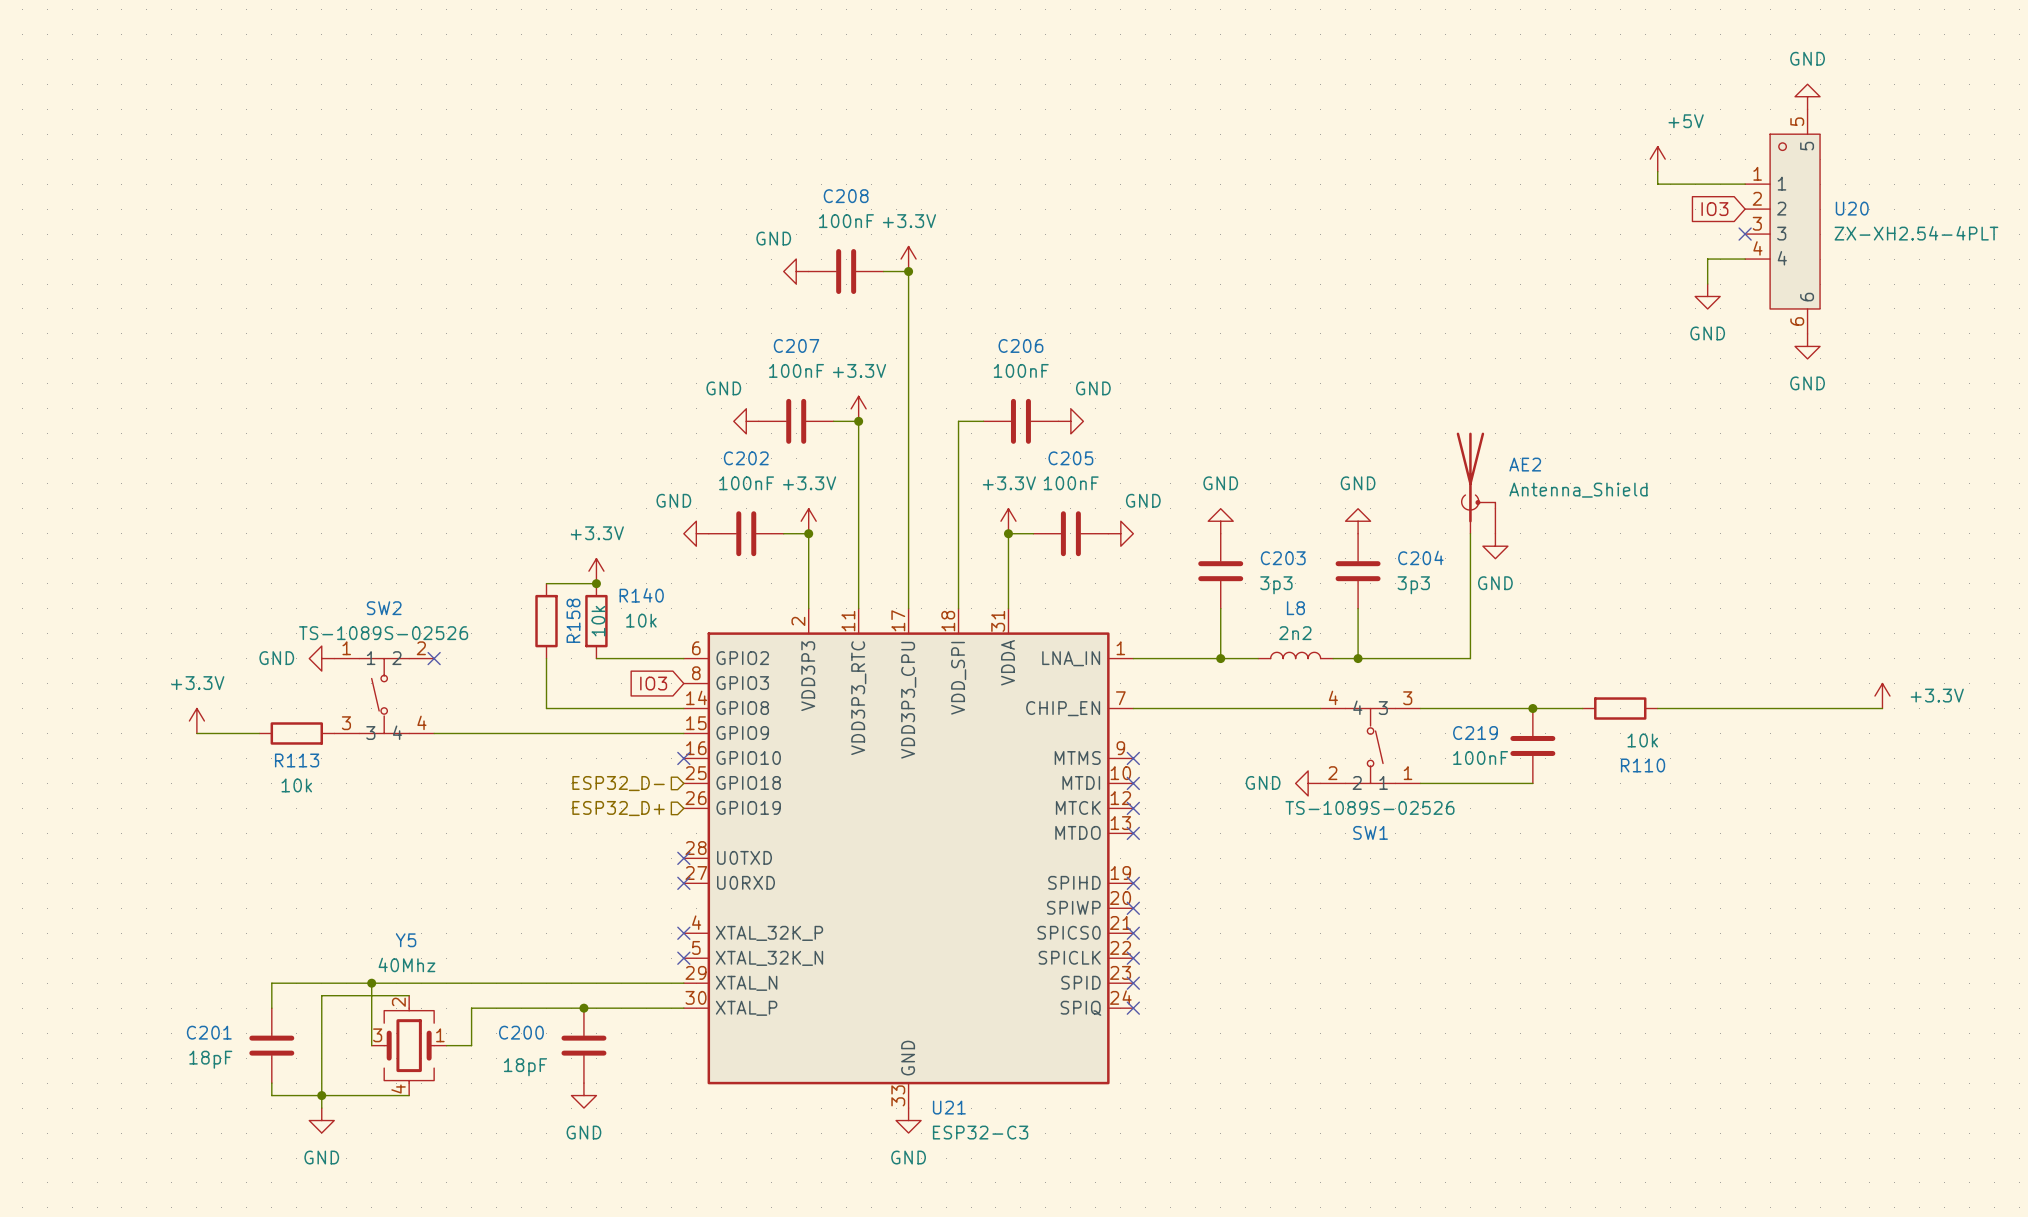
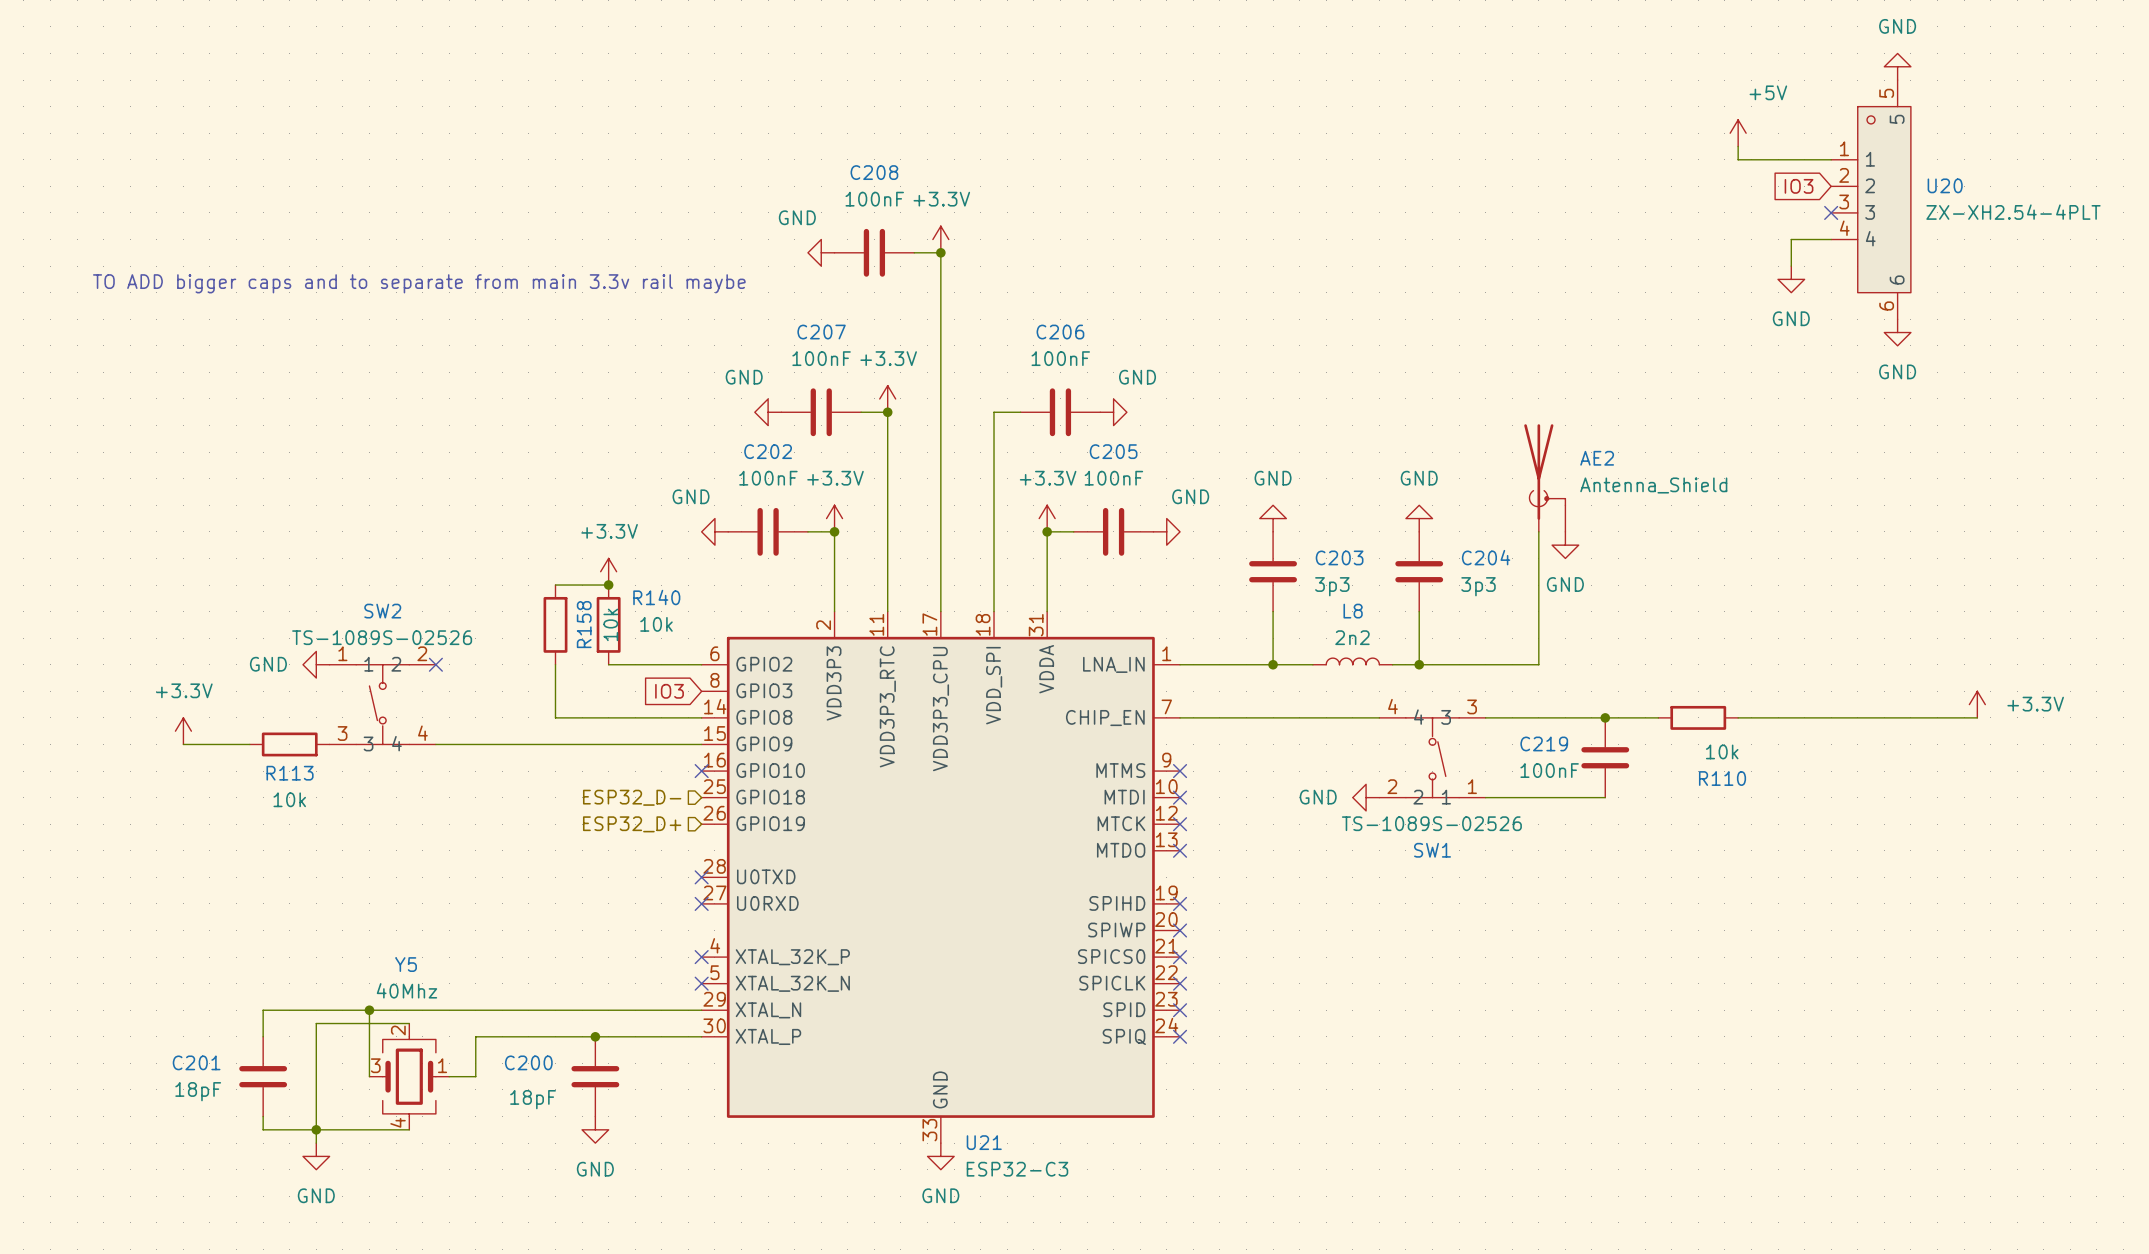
text: none -> TO ADD bigger caps and to separate from main 3.3v rail maybe (419, 283)

